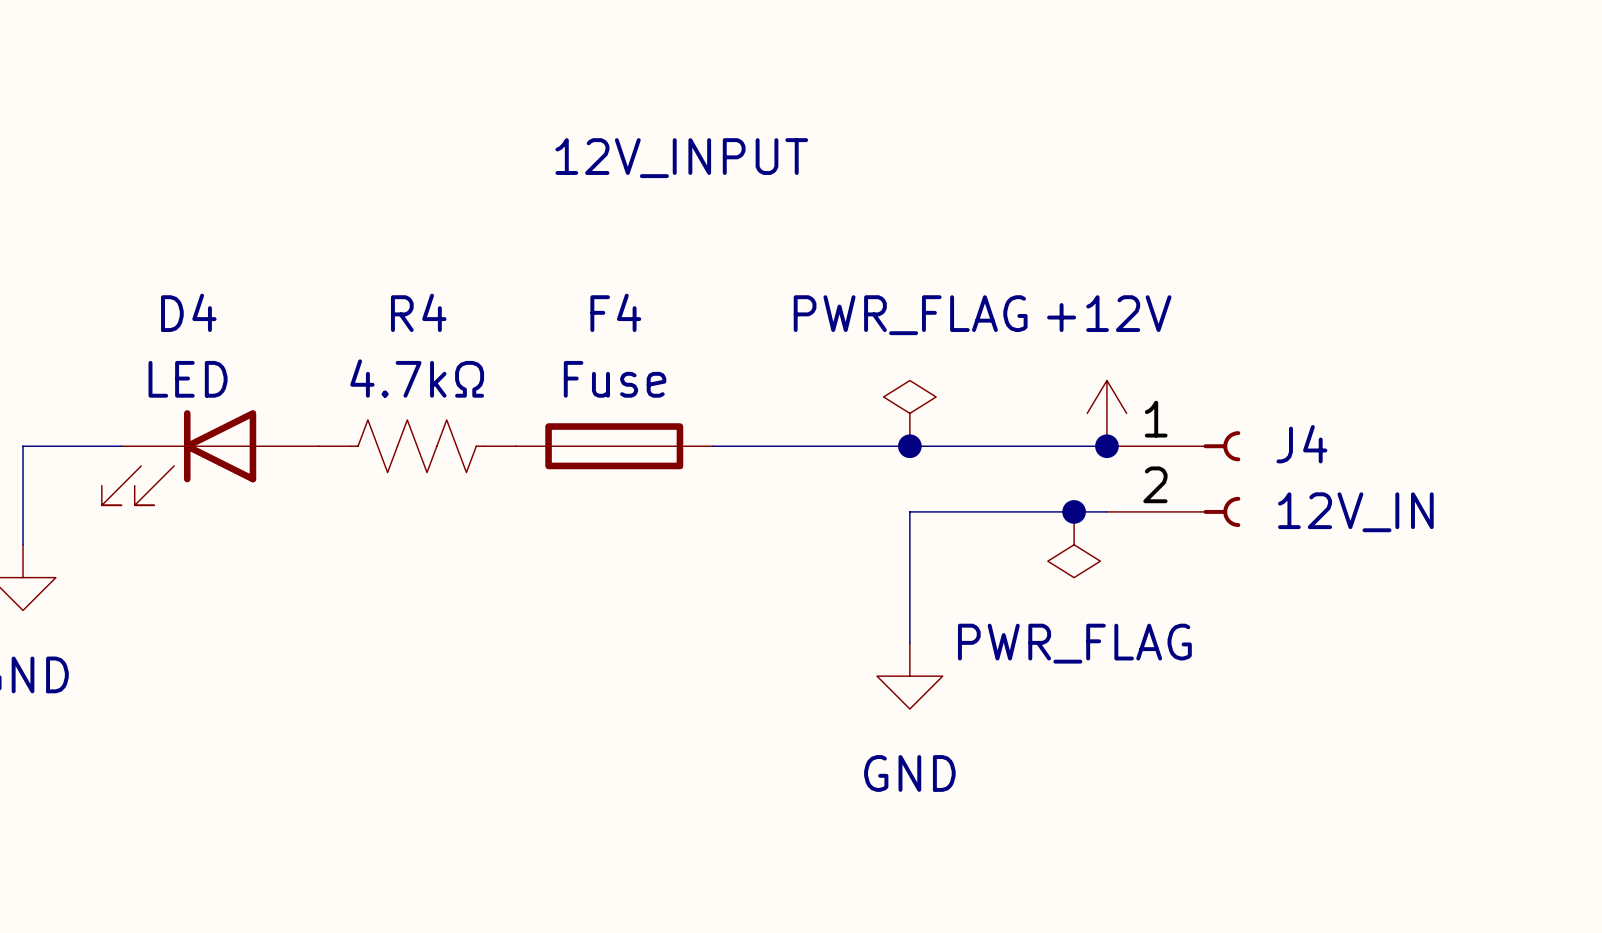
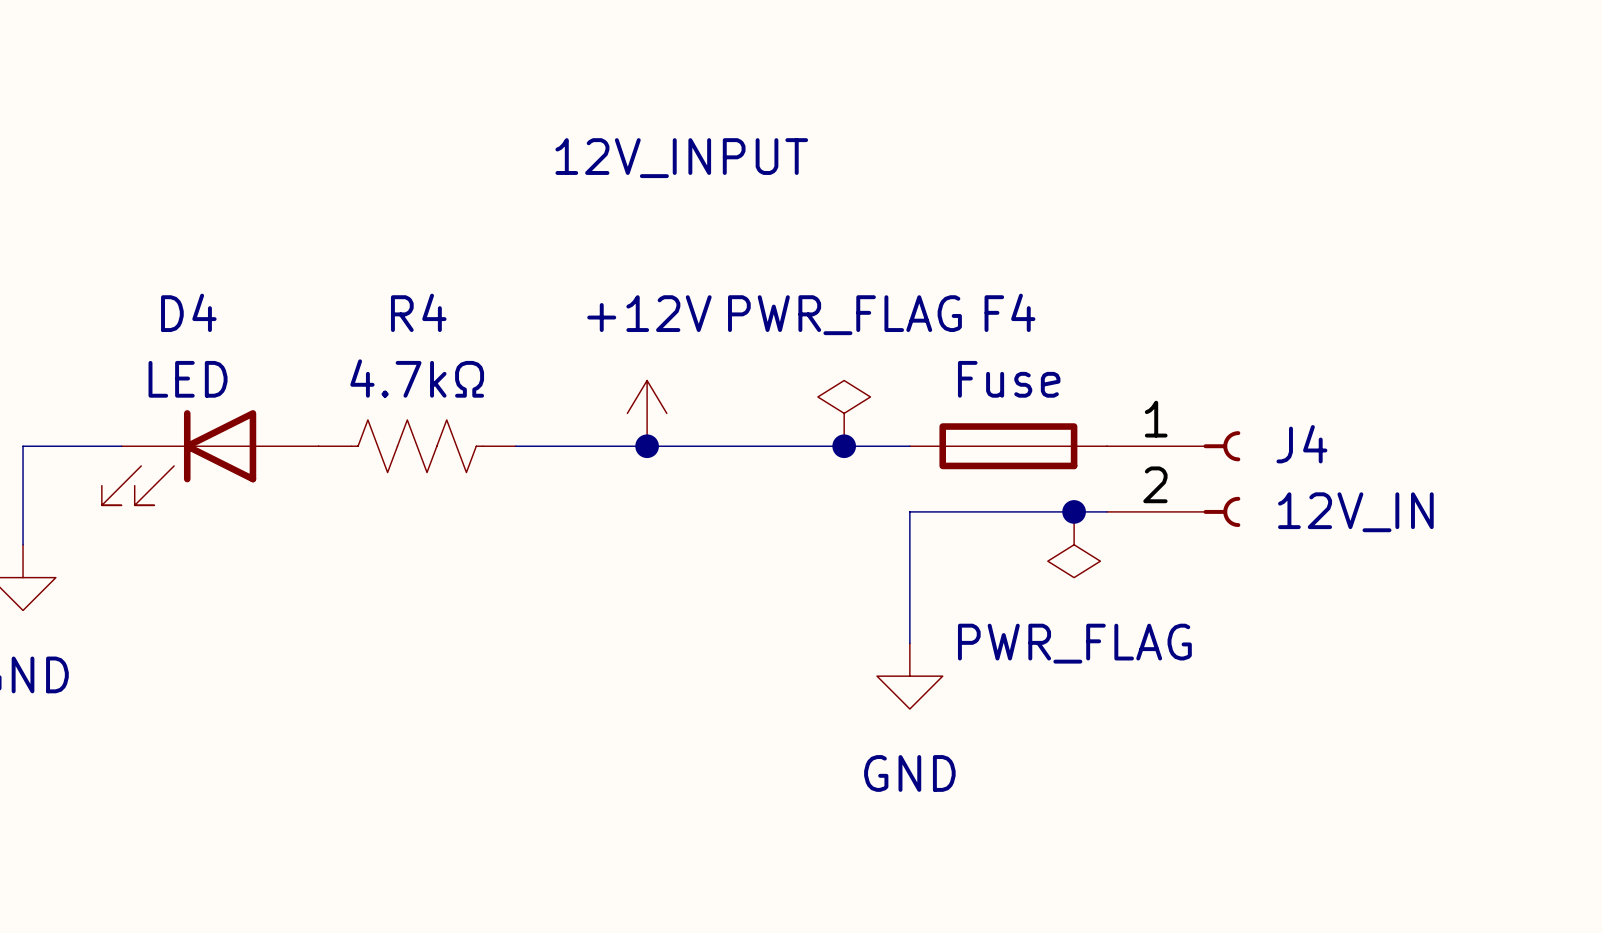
power symbol position: PWR_FLAG (909, 413) -> PWR_FLAG (844, 413)
power symbol position: +12V (1106, 413) -> +12V (647, 413)
F4 position: (614, 446) -> (1008, 446)
junction: none -> (647, 446)
junction position: (909, 446) -> (844, 446)
junction: (1106, 446) -> none

